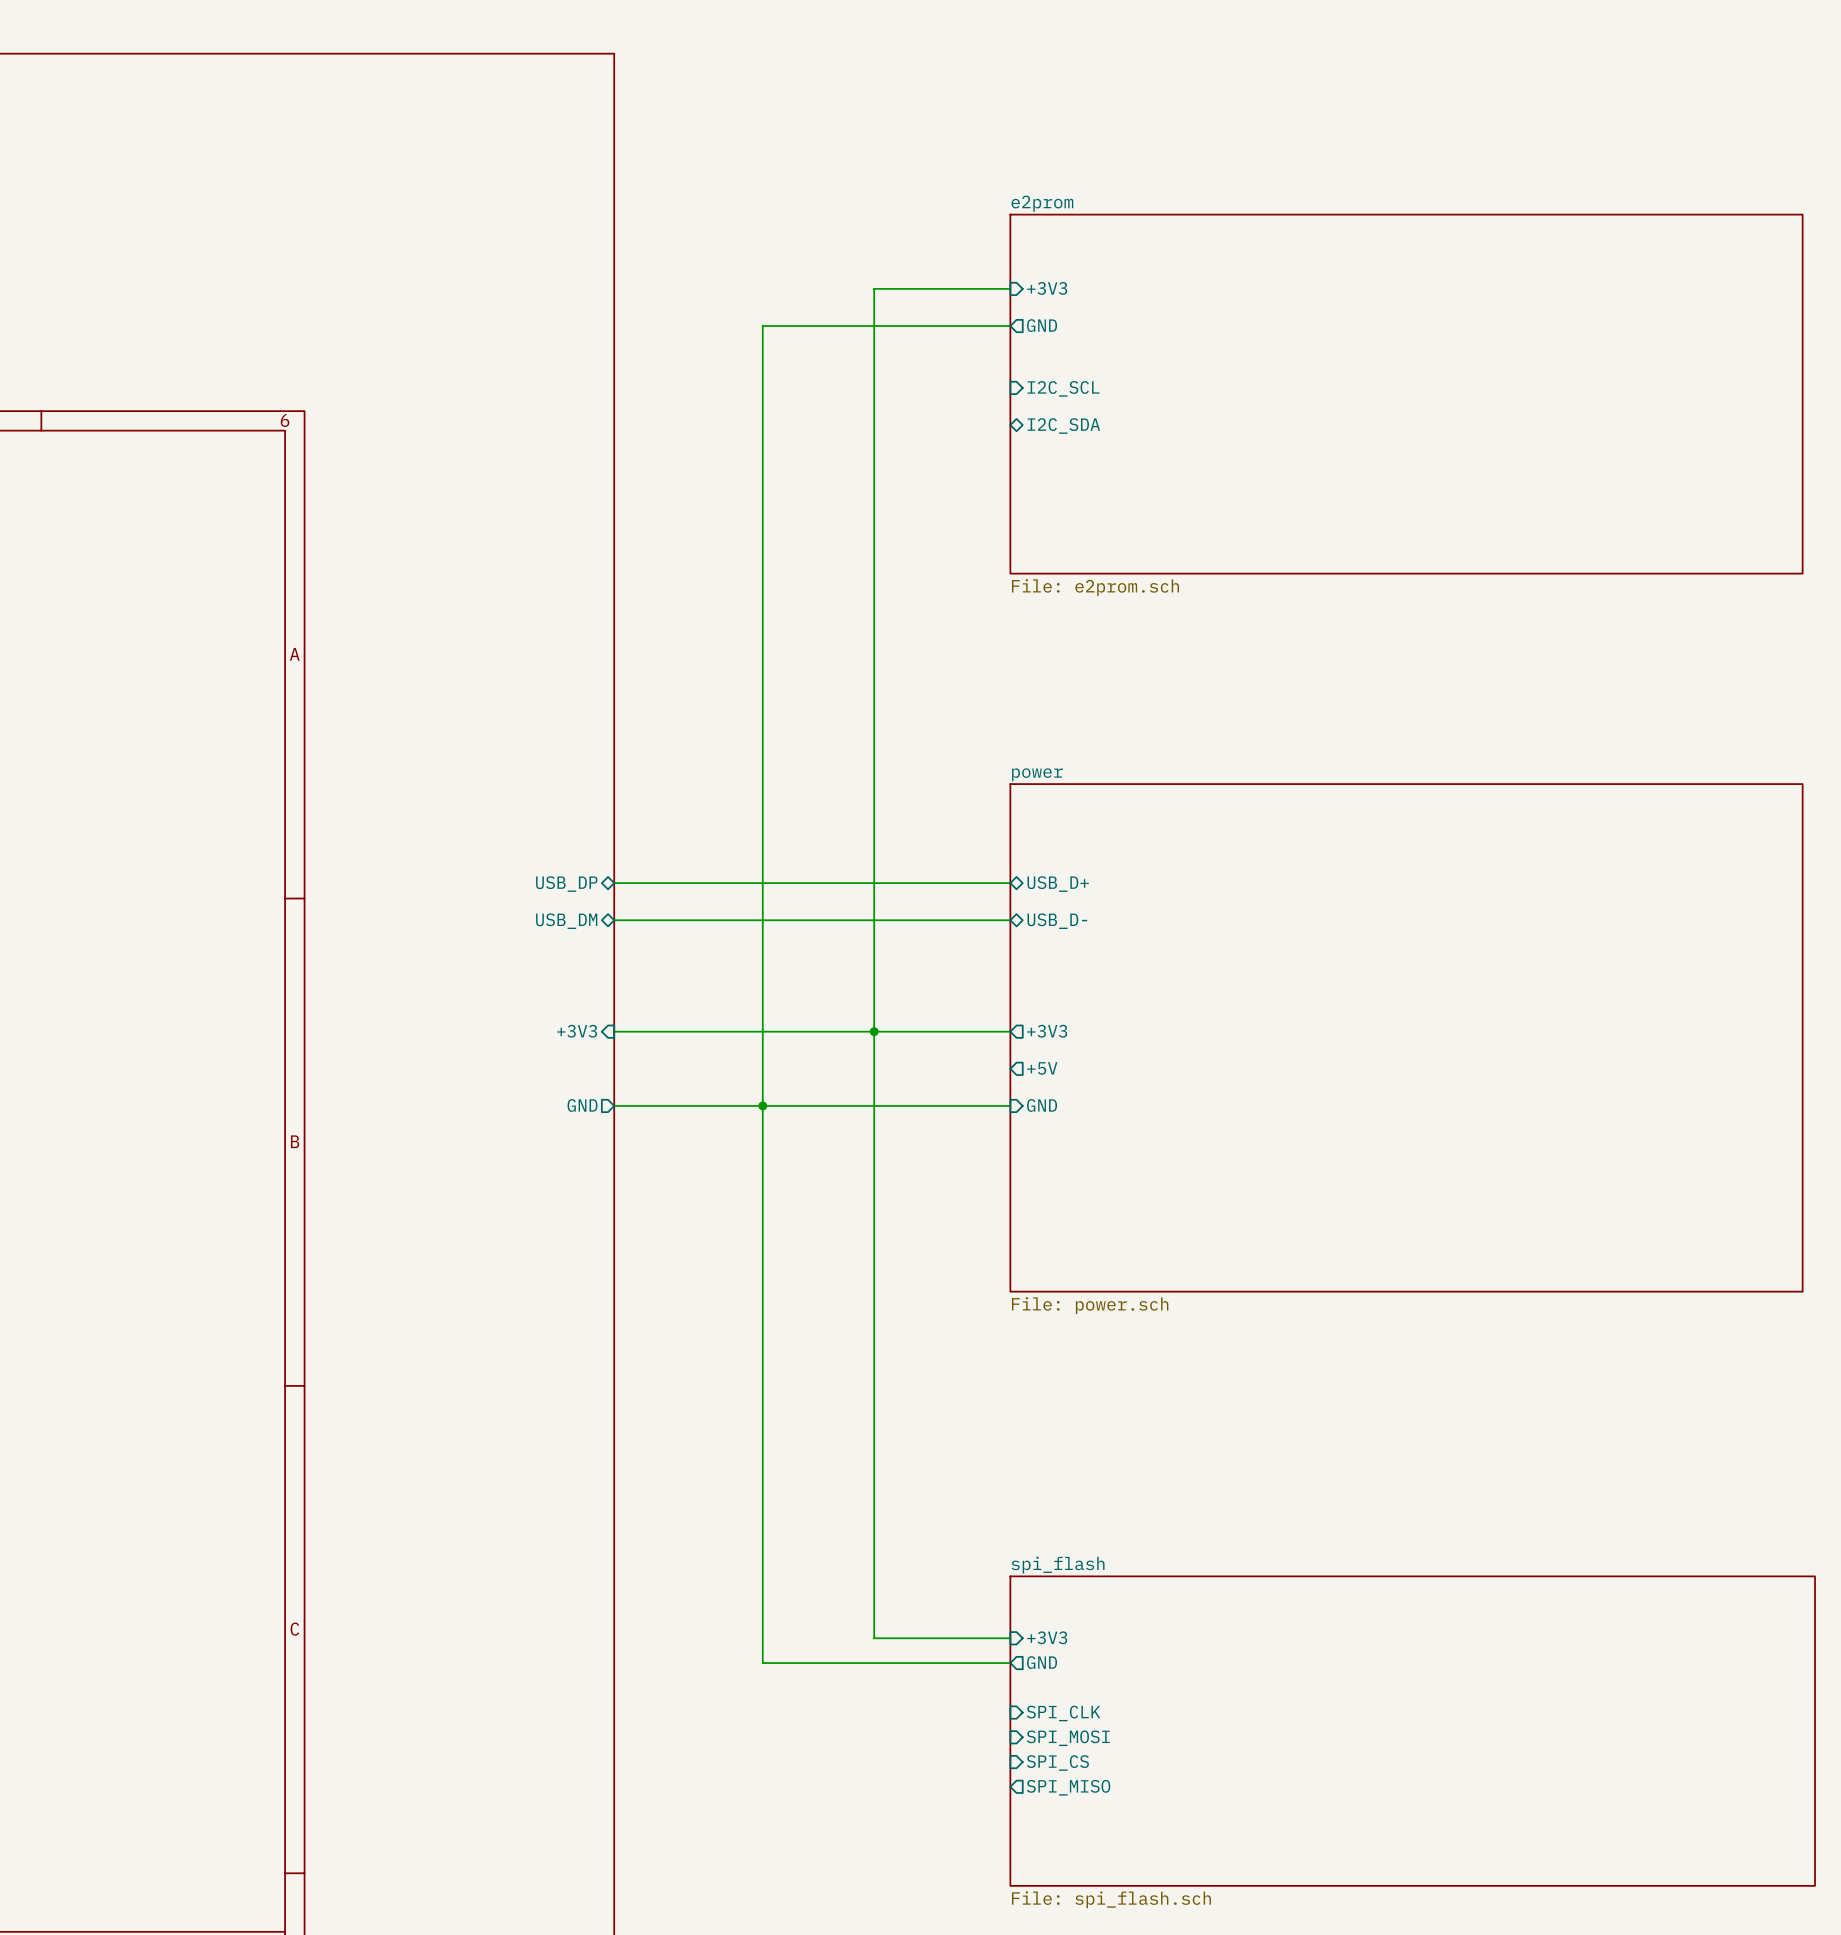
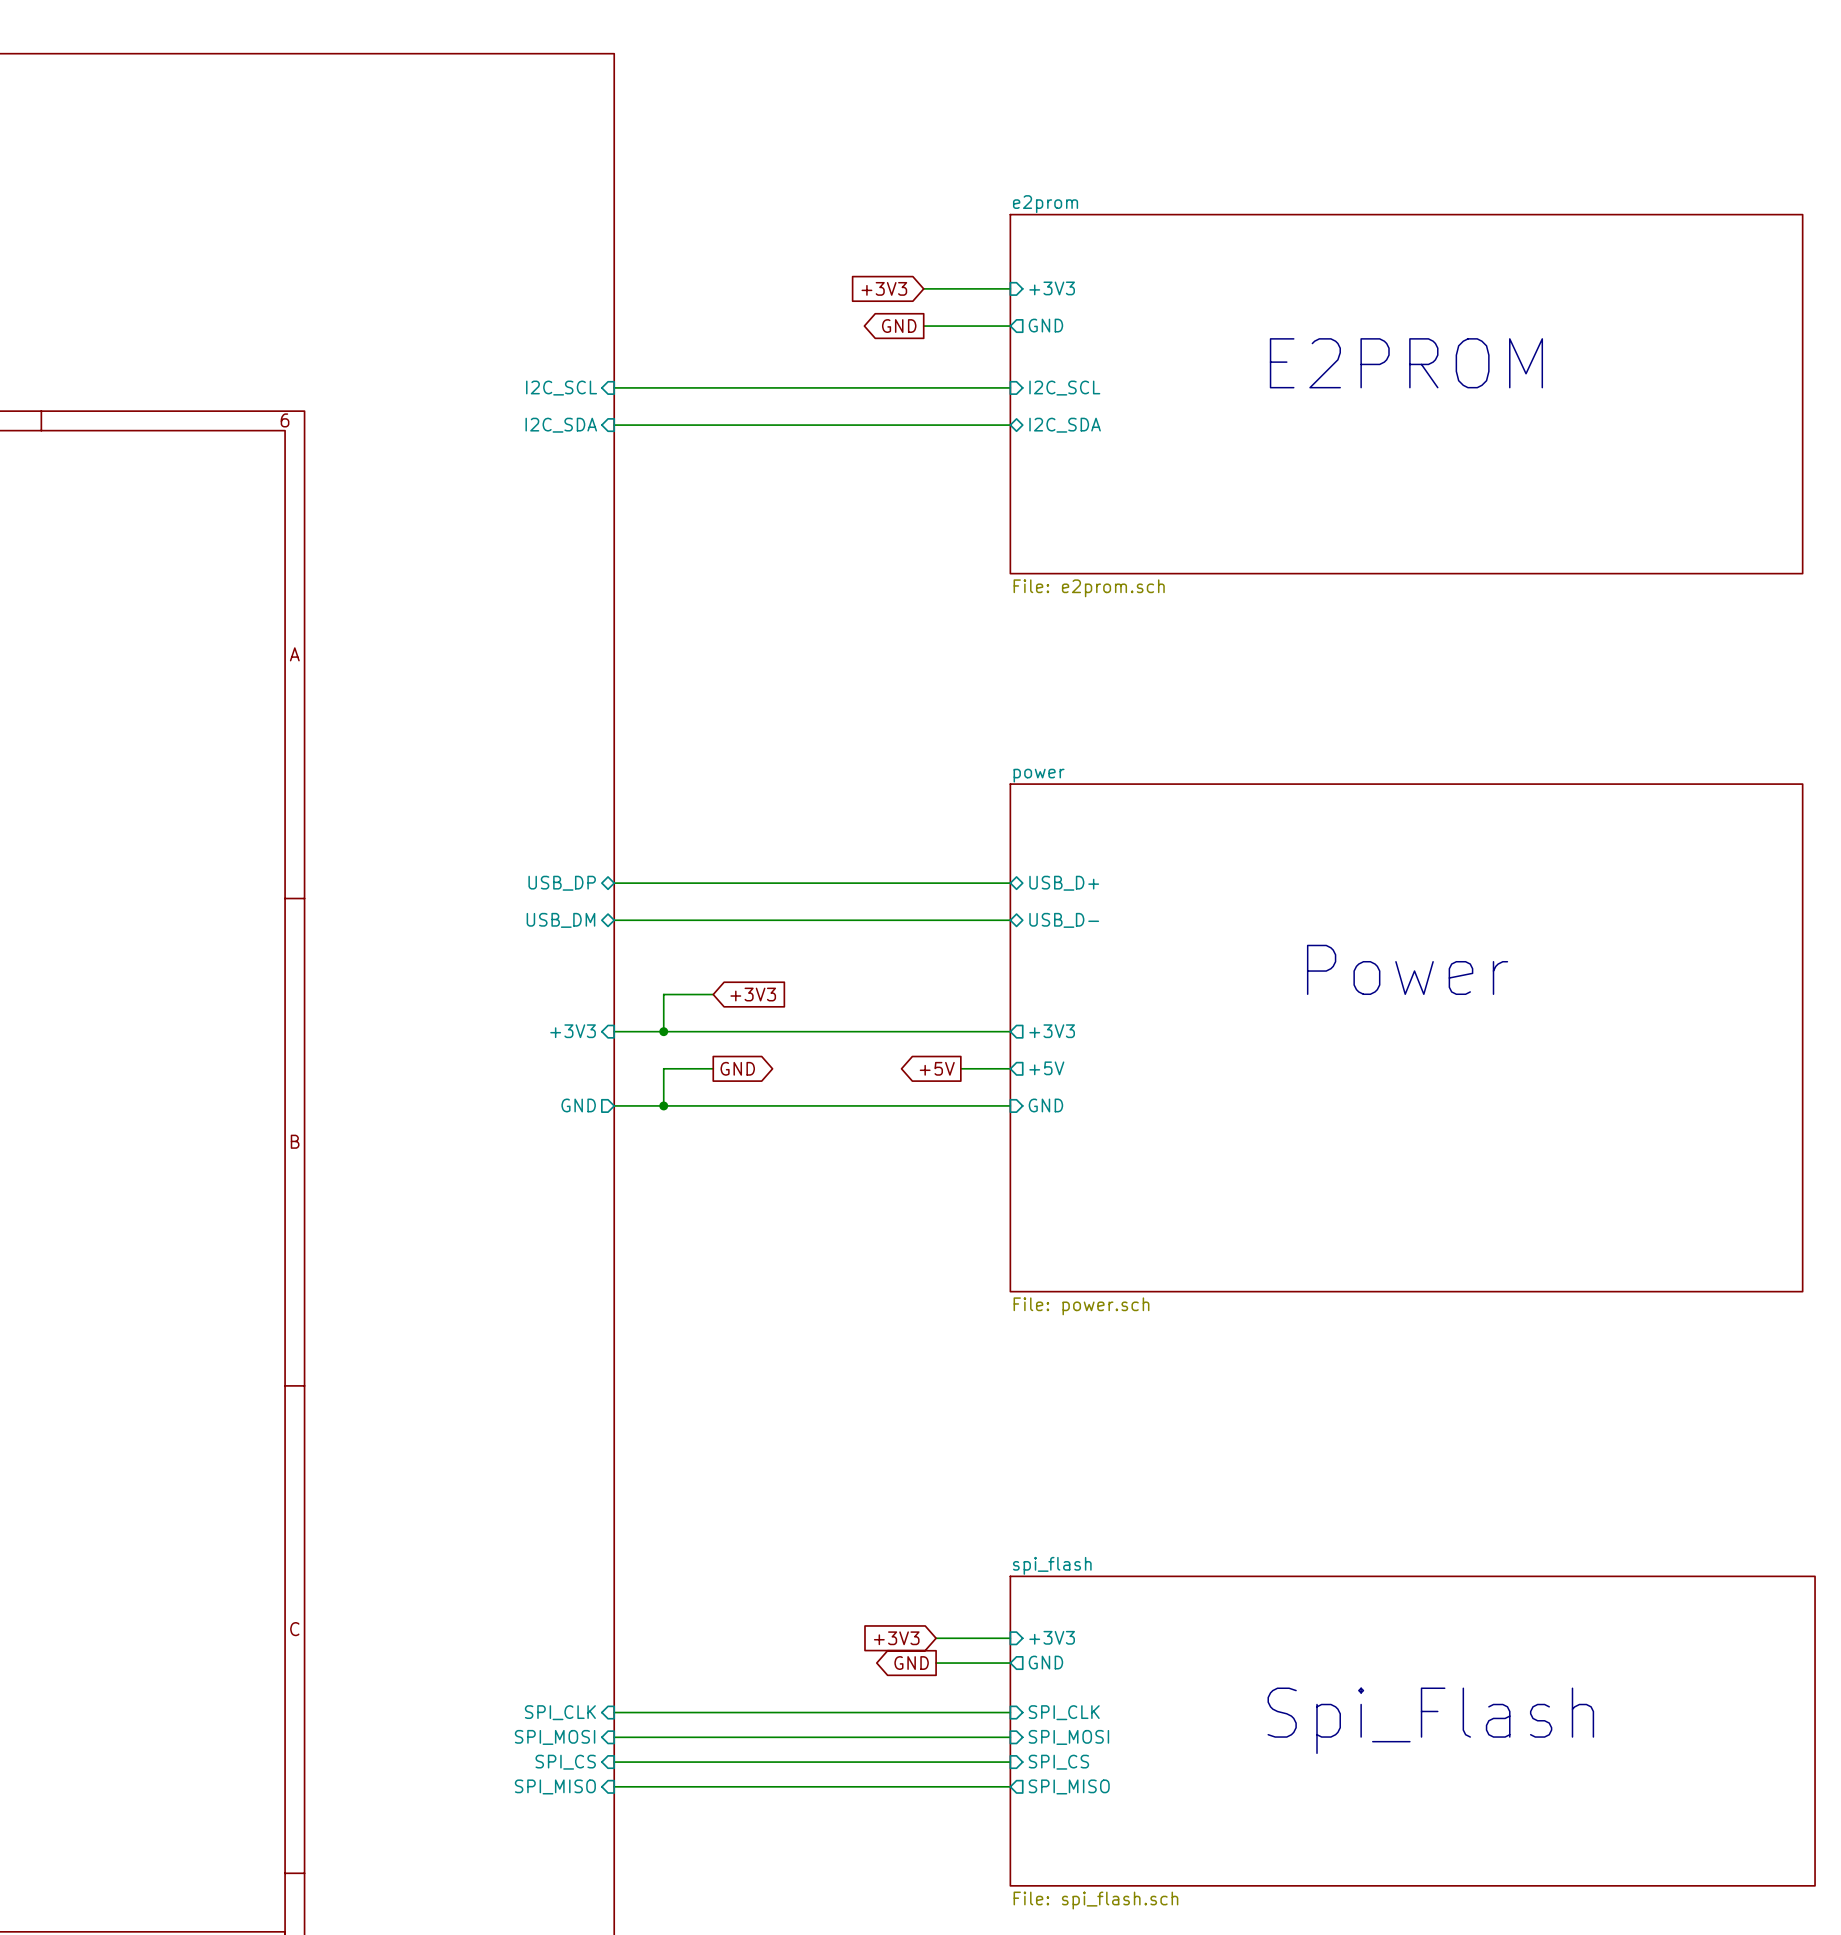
global label: none -> +3V3 (884, 288)
wire: (923, 288) (874, 288) (874, 1638) (936, 1638) -> none
global label: none -> GND (899, 326)
wire: (923, 326) (762, 326) (762, 1663) (936, 1663) -> none
text: none -> E2PROM (1406, 363)
wire: none -> (614, 387) (1010, 387)
sheet pin: none -> I2C_SCL (561, 388)
wire: none -> (614, 425) (1010, 425)
sheet pin: none -> I2C_SDA (561, 425)
text: none -> Power (1407, 969)
wire: none -> (713, 994) (663, 994) (663, 1031)
global label: none -> +3V3 (753, 994)
junction: none -> (663, 1031)
junction: (874, 1031) -> none
wire: none -> (713, 1068) (663, 1068) (663, 1105)
global label: none -> GND (737, 1068)
global label: none -> +5V (937, 1068)
wire: none -> (960, 1068) (1010, 1068)
junction: none -> (663, 1105)
junction: (762, 1105) -> none
global label: none -> +3V3 (896, 1638)
global label: none -> GND (911, 1663)
wire: none -> (614, 1712) (1010, 1712)
sheet pin: none -> SPI_CLK (560, 1712)
text: none -> Spi_Flash (1430, 1720)
wire: none -> (614, 1737) (1010, 1737)
sheet pin: none -> SPI_MOSI (555, 1737)
sheet pin: none -> SPI_CS (565, 1762)
wire: none -> (614, 1762) (1010, 1762)
wire: none -> (614, 1786) (1010, 1786)
sheet pin: none -> SPI_MISO (555, 1786)

